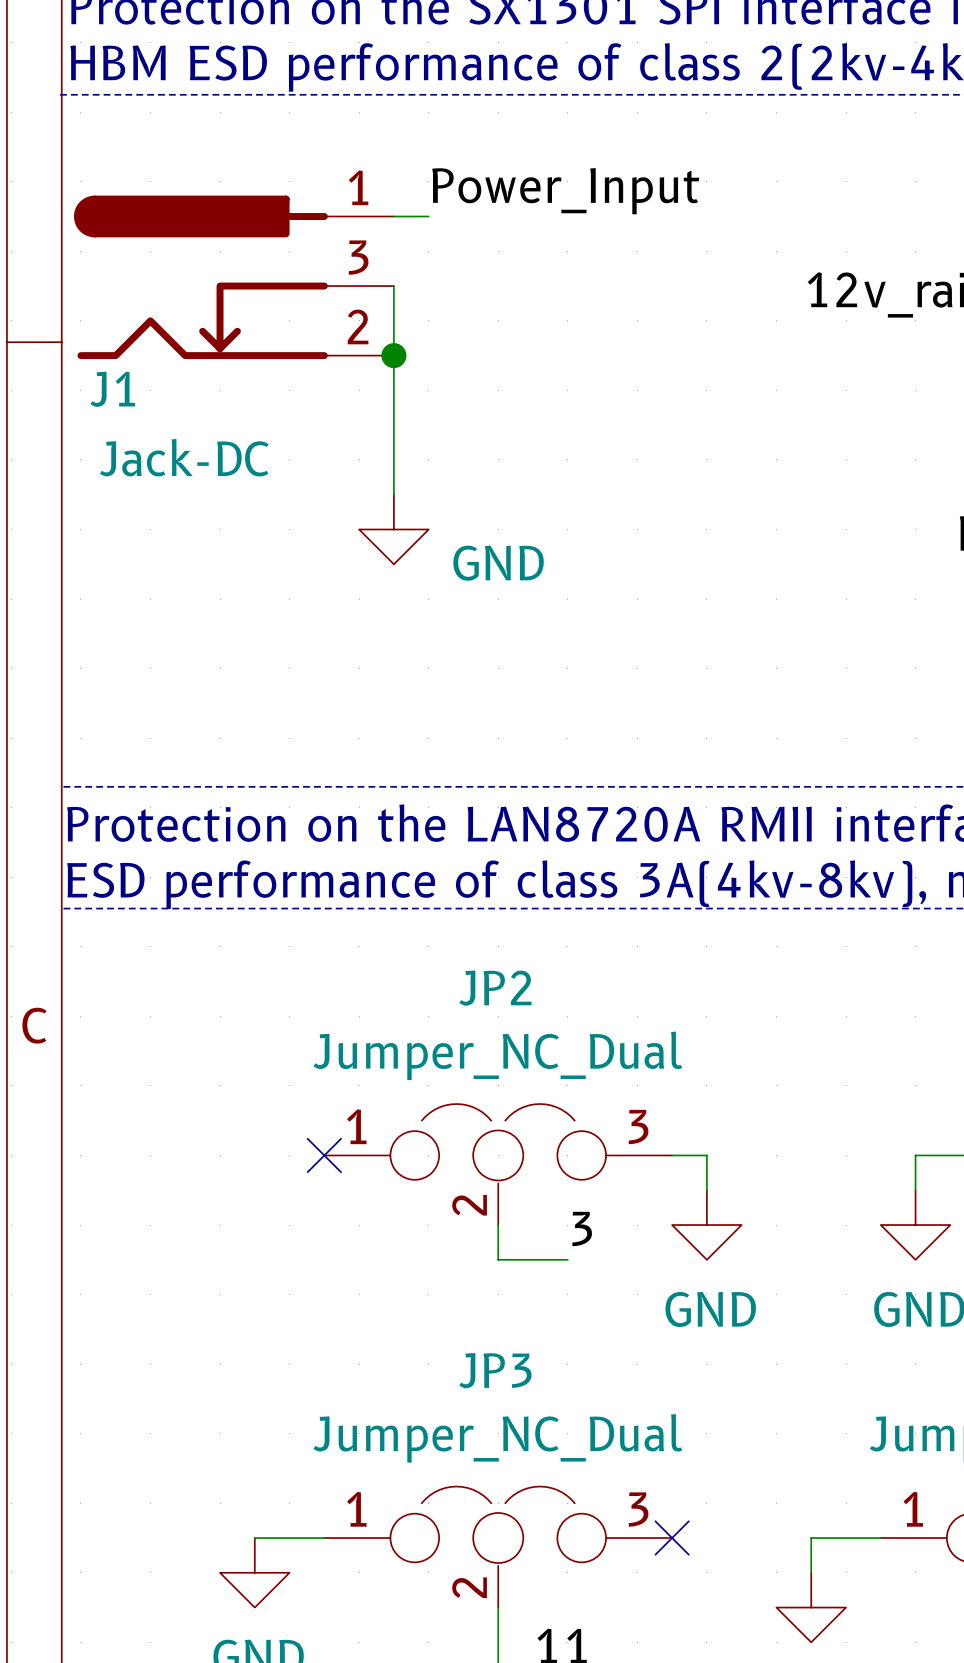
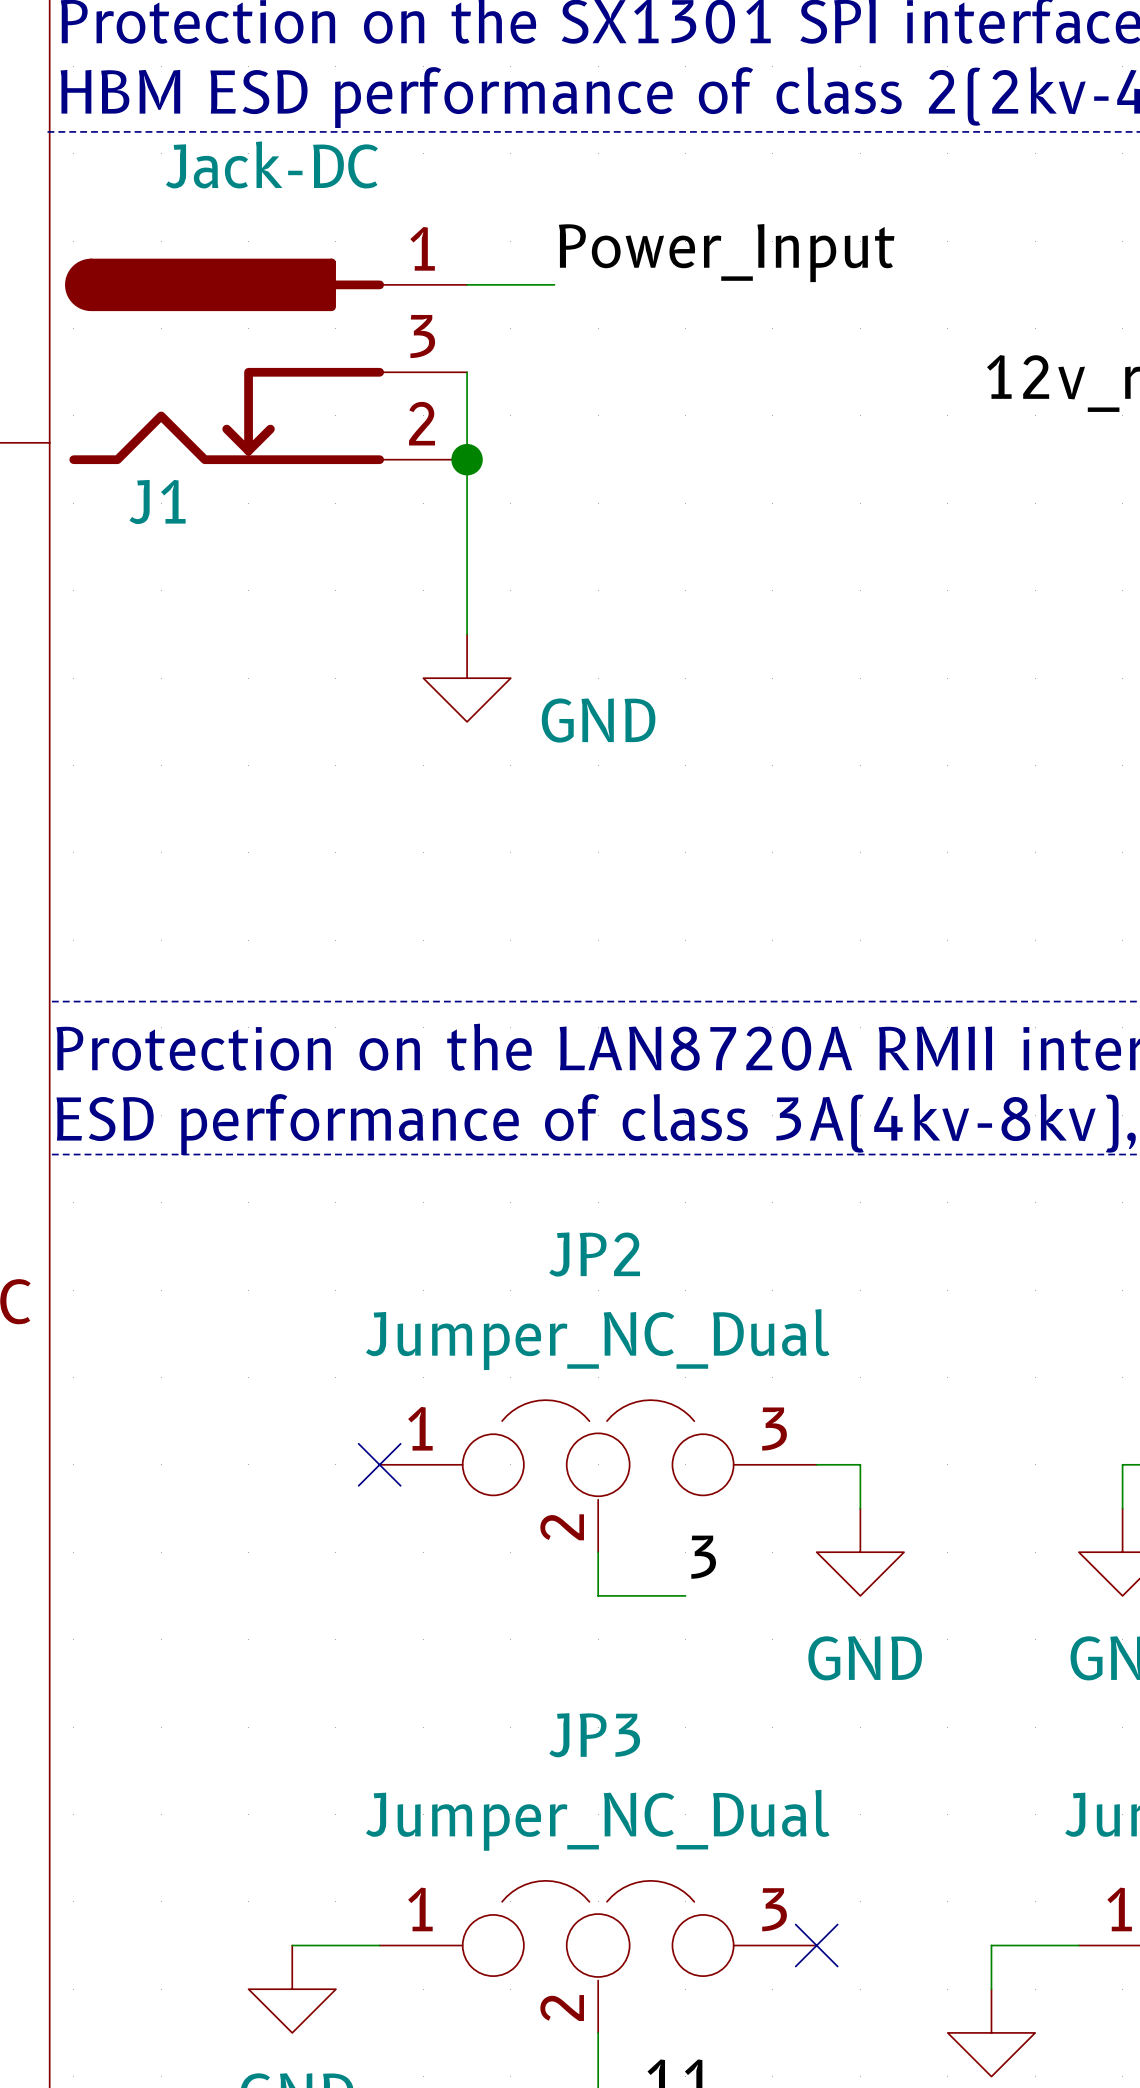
label position: Power_Input (565, 191) -> Power_Input (726, 253)
wire: none -> (510, 284) (554, 284)
J1 name position: J1 (112, 389) -> J1 (157, 501)
J1 value position: Jack-DC (184, 457) -> Jack-DC (271, 164)

